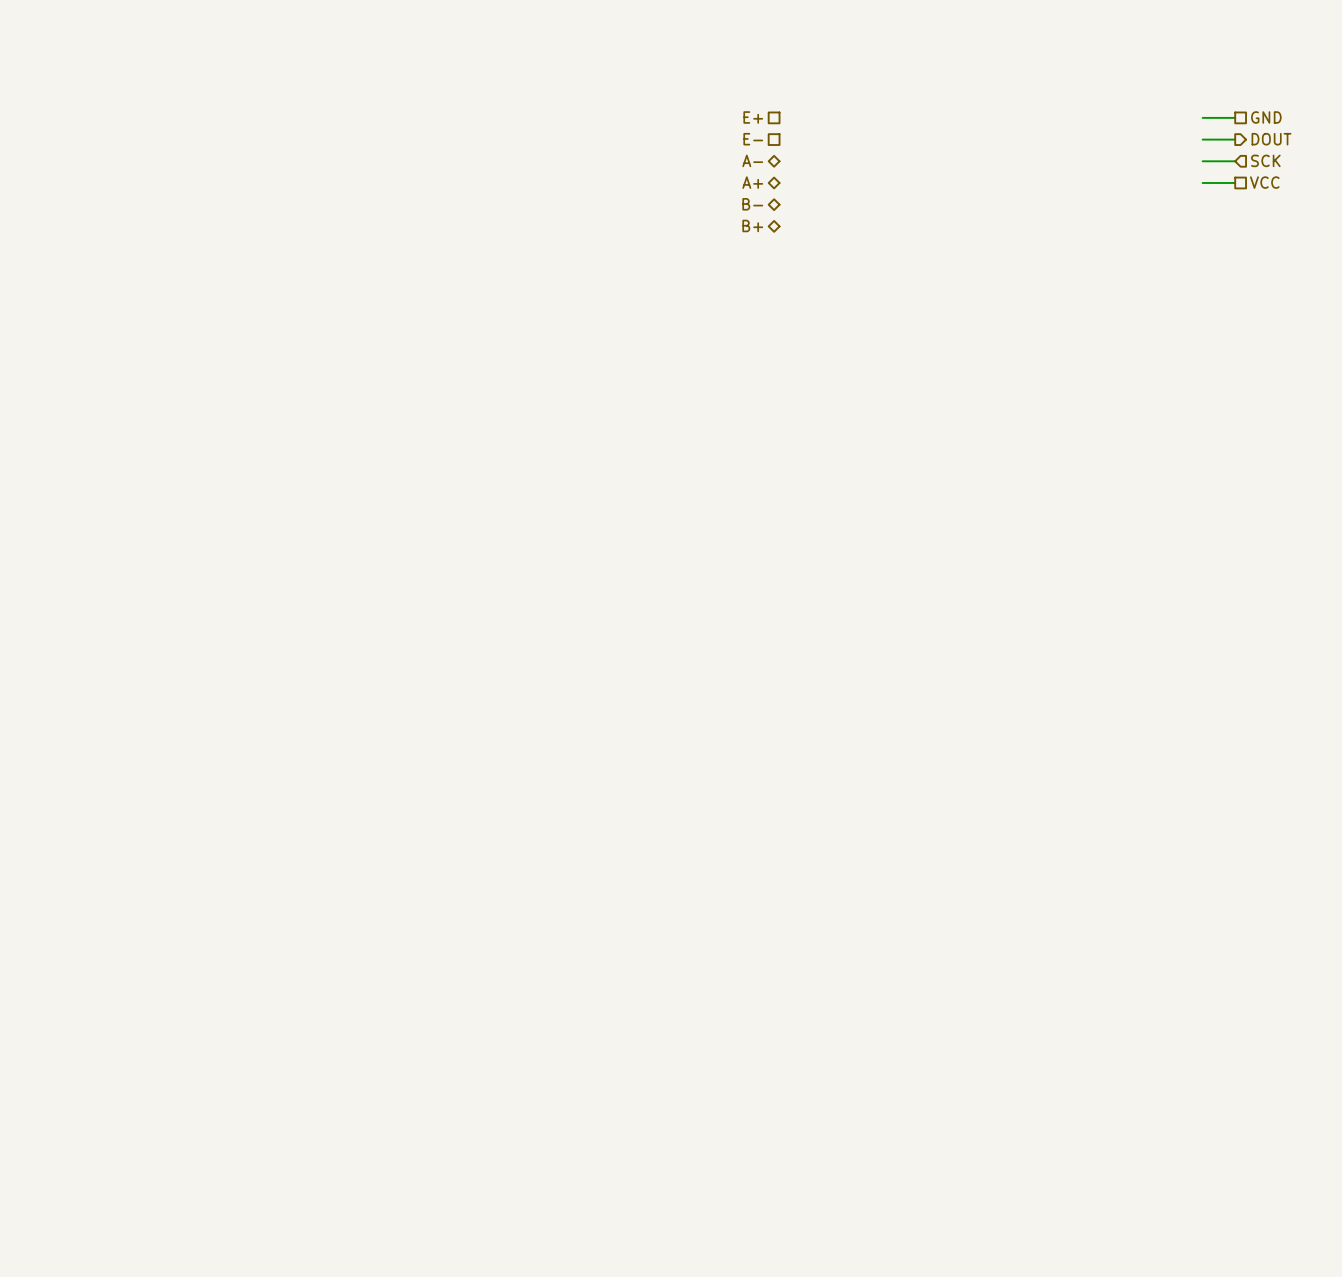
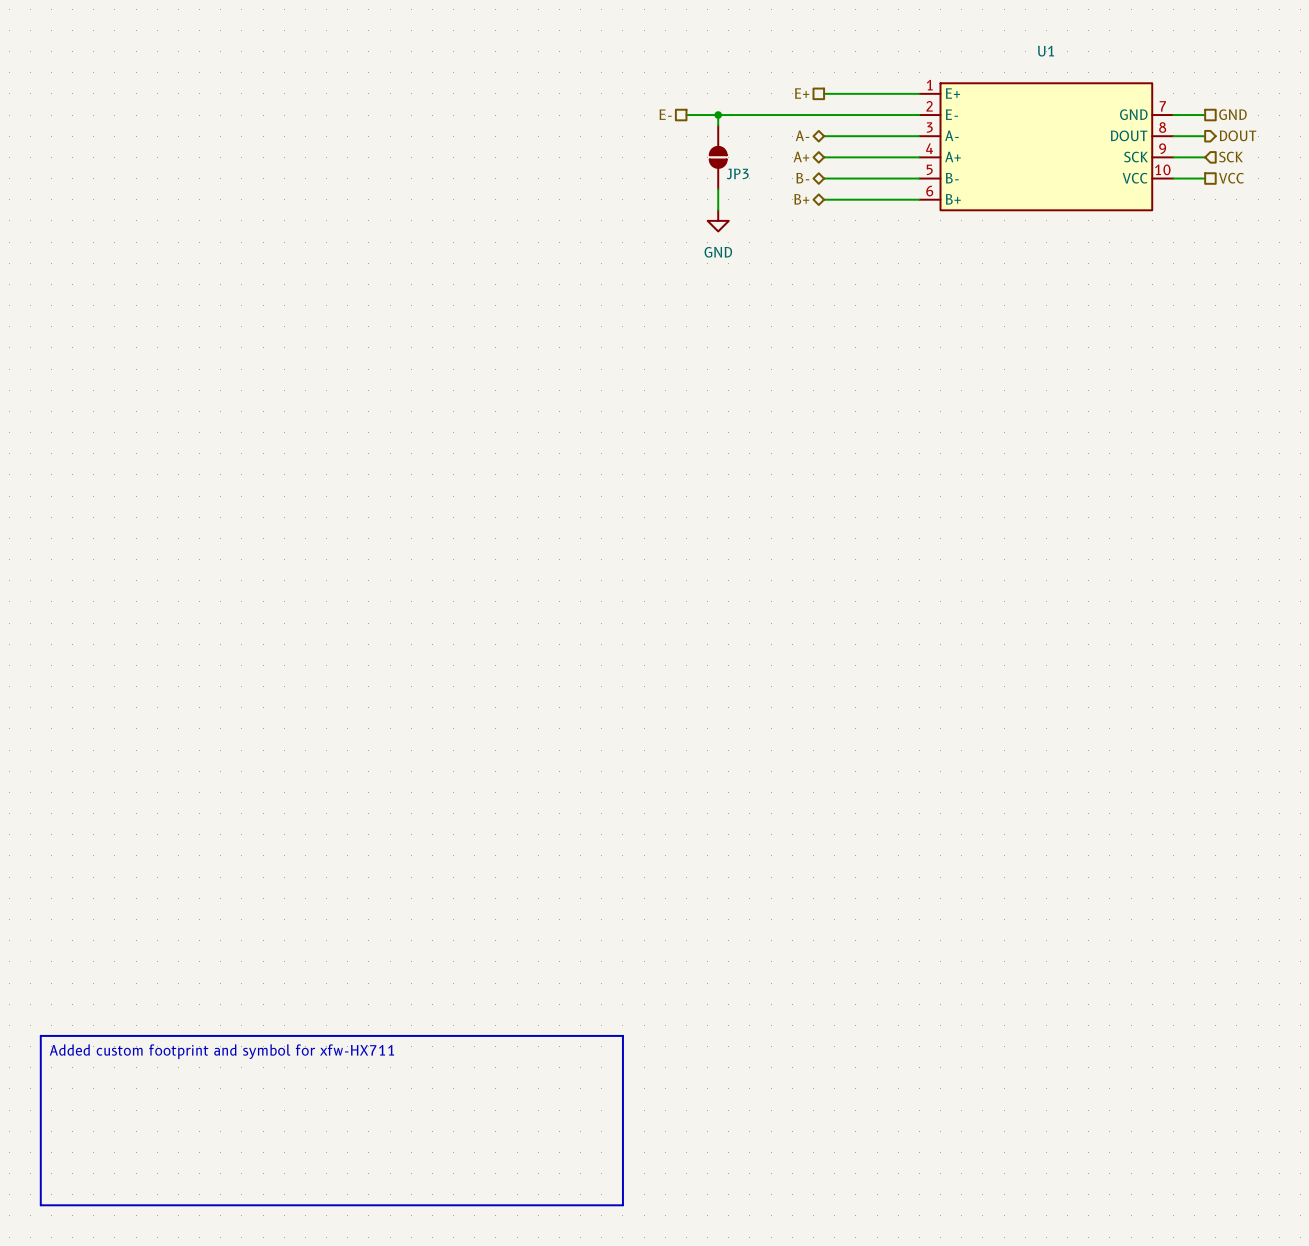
wire: none -> (824, 93) (919, 93)
wire: none -> (686, 115) (919, 115)
wire: none -> (718, 115) (718, 125)
junction: none -> (718, 115)
hierarchical label position: E+ (753, 117) -> E+ (802, 93)
hierarchical label position: E- (753, 139) -> E- (665, 114)
wire: none -> (824, 136) (919, 136)
U1: none -> (1046, 146)
hierarchical label position: A- (752, 160) -> A- (802, 135)
JP3: none -> (718, 157)
wire: none -> (824, 157) (919, 157)
hierarchical label position: A+ (752, 182) -> A+ (801, 156)
wire: none -> (824, 178) (919, 178)
wire: none -> (718, 189) (718, 210)
hierarchical label position: B- (752, 204) -> B- (802, 178)
wire: none -> (824, 199) (919, 199)
hierarchical label position: B+ (752, 225) -> B+ (801, 199)
power symbol: none -> GND (718, 220)
line: none -> (40, 1035) (622, 1035) (622, 1205) (40, 1205) (40, 1035)
text: none -> Added custom footprint and symbol for xfw-HX711 (221, 1051)

